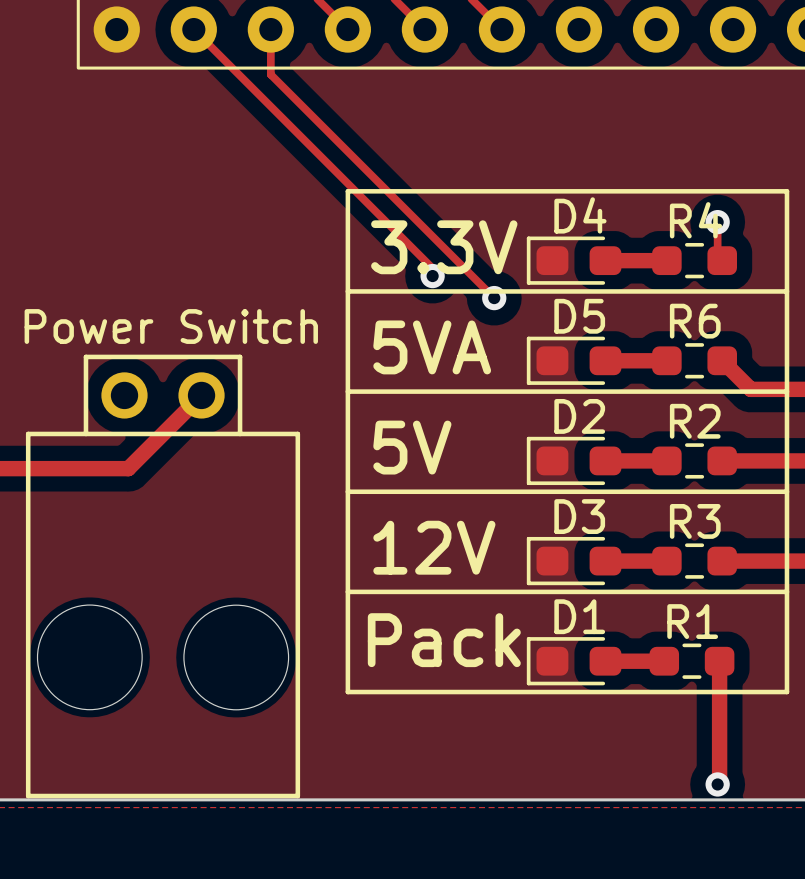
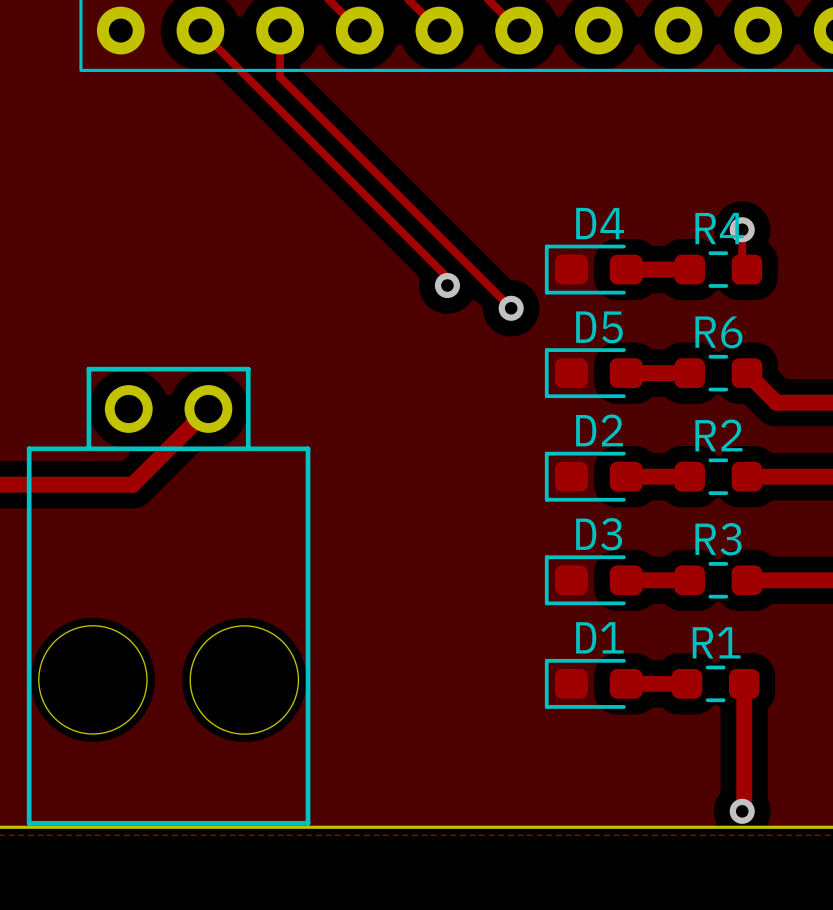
line: (347, 191) (786, 191) (786, 692) (347, 692) (347, 191) -> none
text: 3.3V (444, 247) -> none
line: (347, 291) (786, 291) -> none
text: Power Switch (171, 326) -> none
text: 5VA (432, 347) -> none
line: (347, 391) (786, 391) -> none
text: 5V (412, 447) -> none
line: (347, 491) (786, 491) -> none
text: 12V (434, 547) -> none
line: (347, 591) (786, 591) -> none
text: Pack (444, 640) -> none

